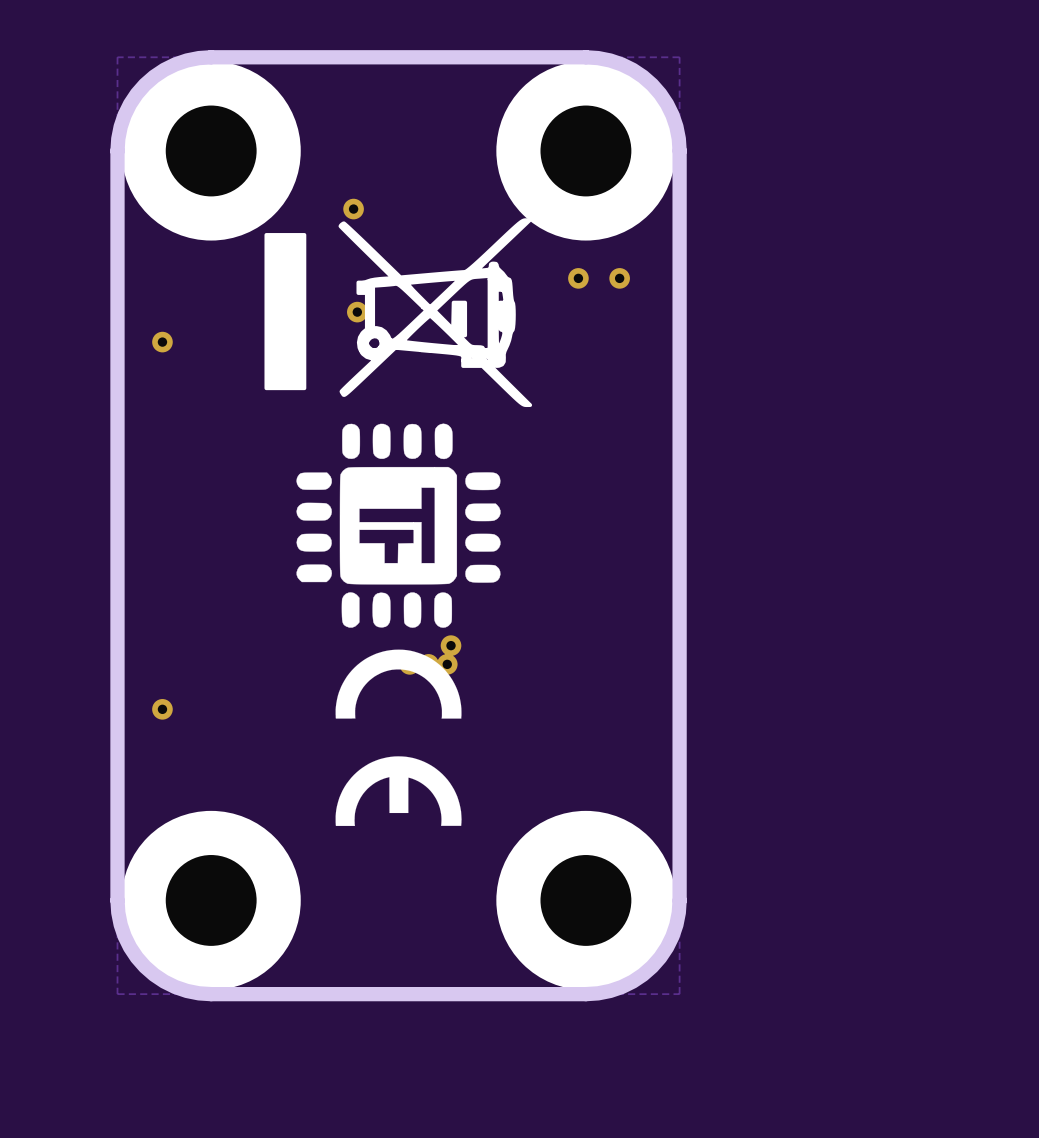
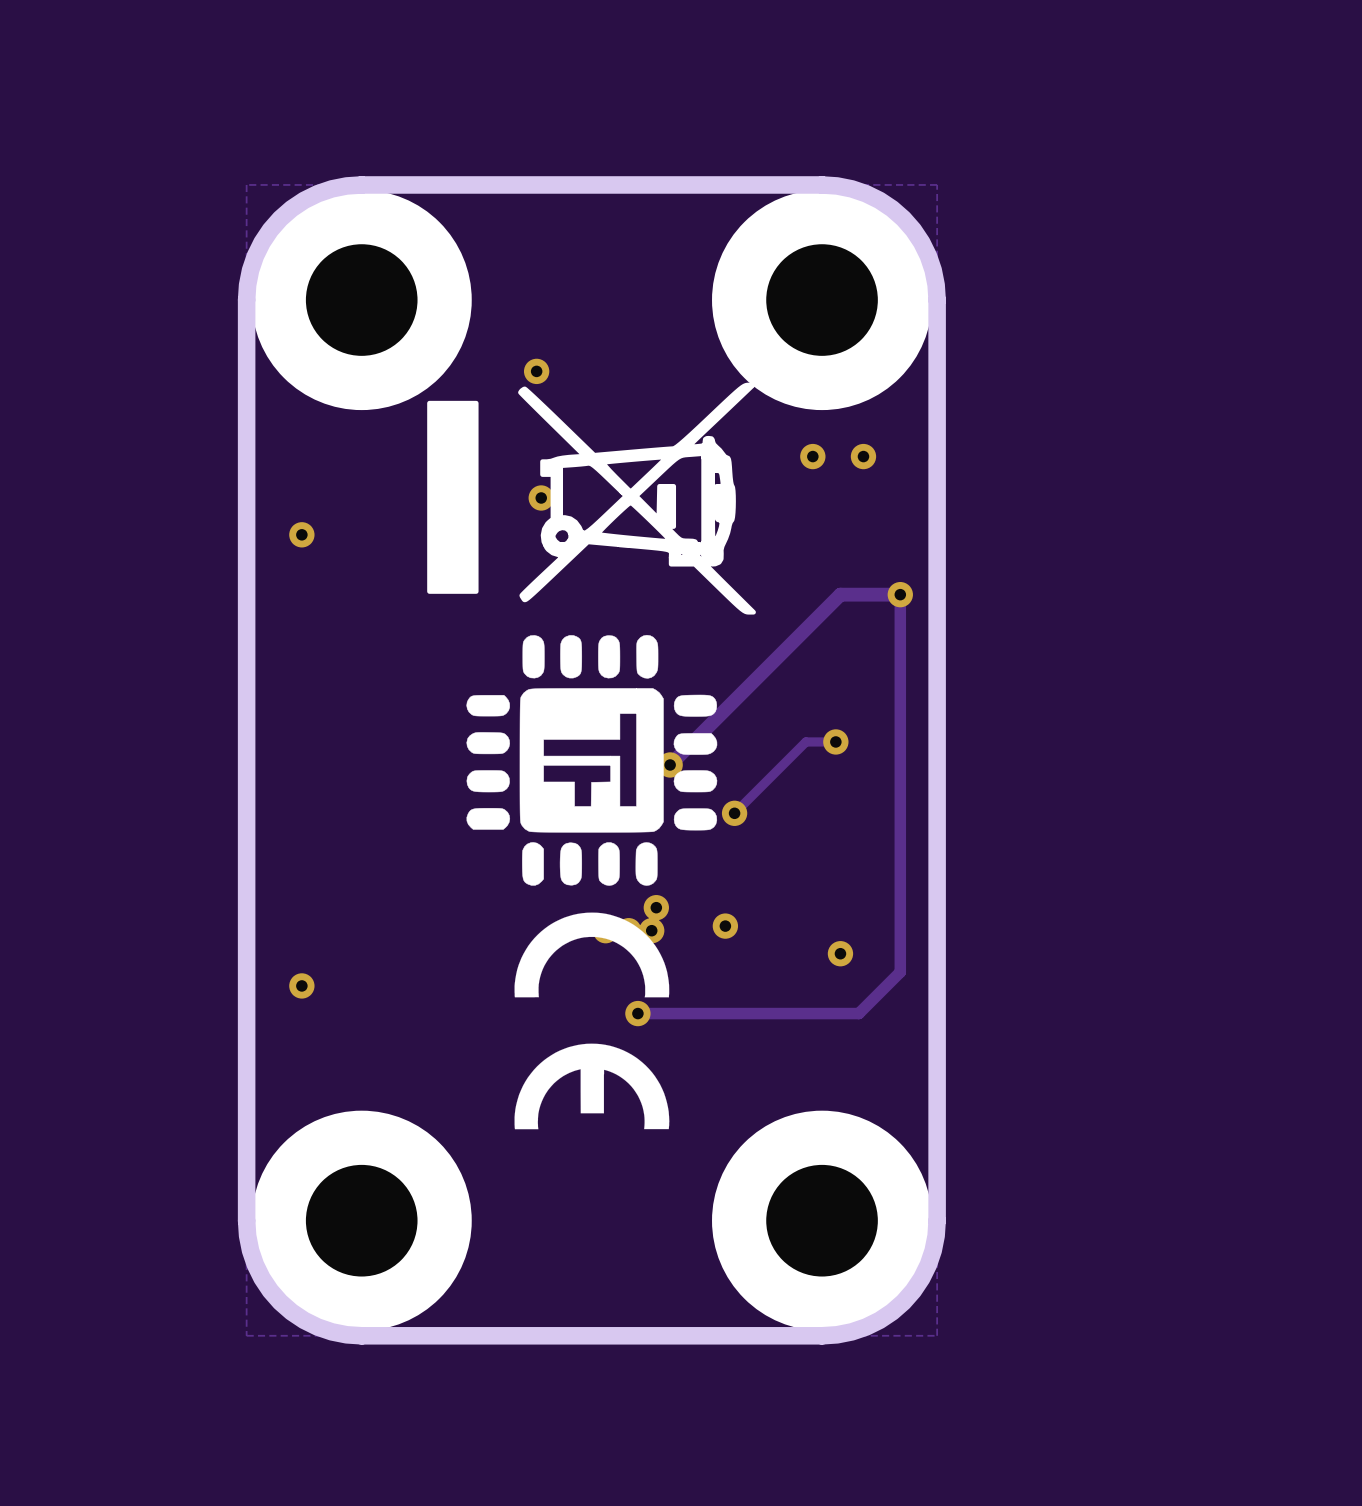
via: none -> (900, 594)
track: none -> (835, 741) (805, 741) (734, 813)
via: none -> (835, 741)
track: none -> (670, 764) (840, 594) (900, 594) (900, 972) (858, 1013) (637, 1013)
via: none -> (670, 764)
via: none -> (734, 813)
via: none -> (725, 926)
via: none -> (840, 953)
via: none -> (637, 1013)

